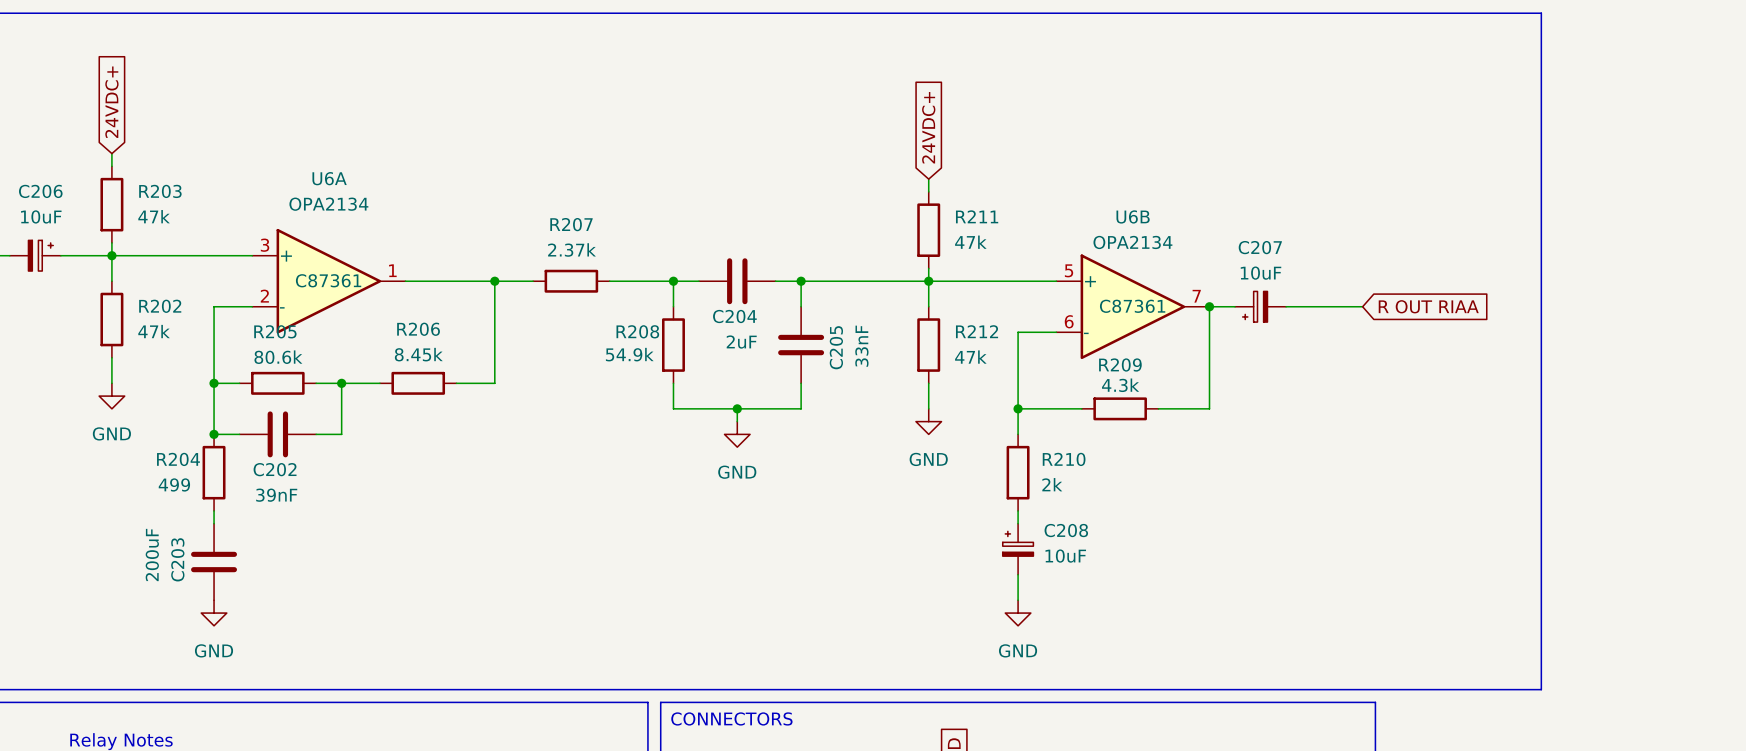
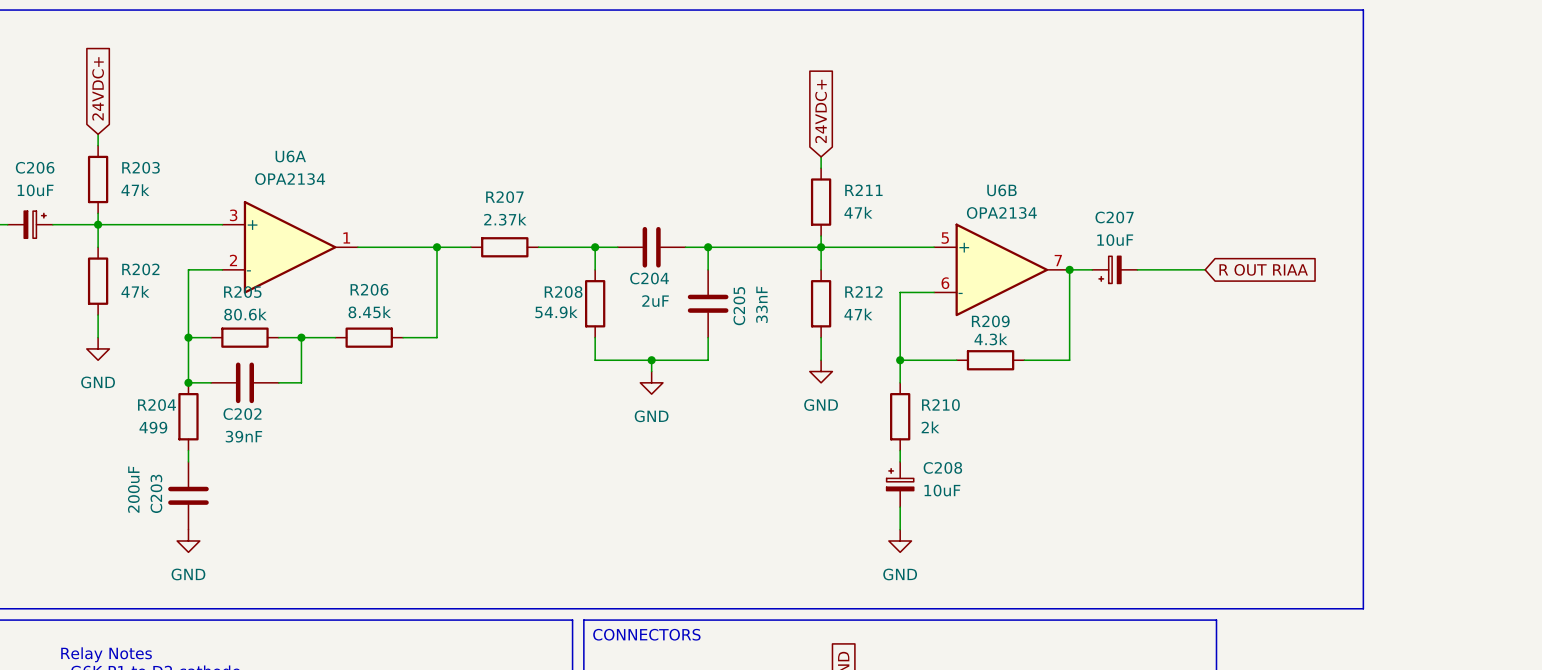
U6A text: C87361 (328, 280) -> none
U6B text: C87361 (1132, 306) -> none

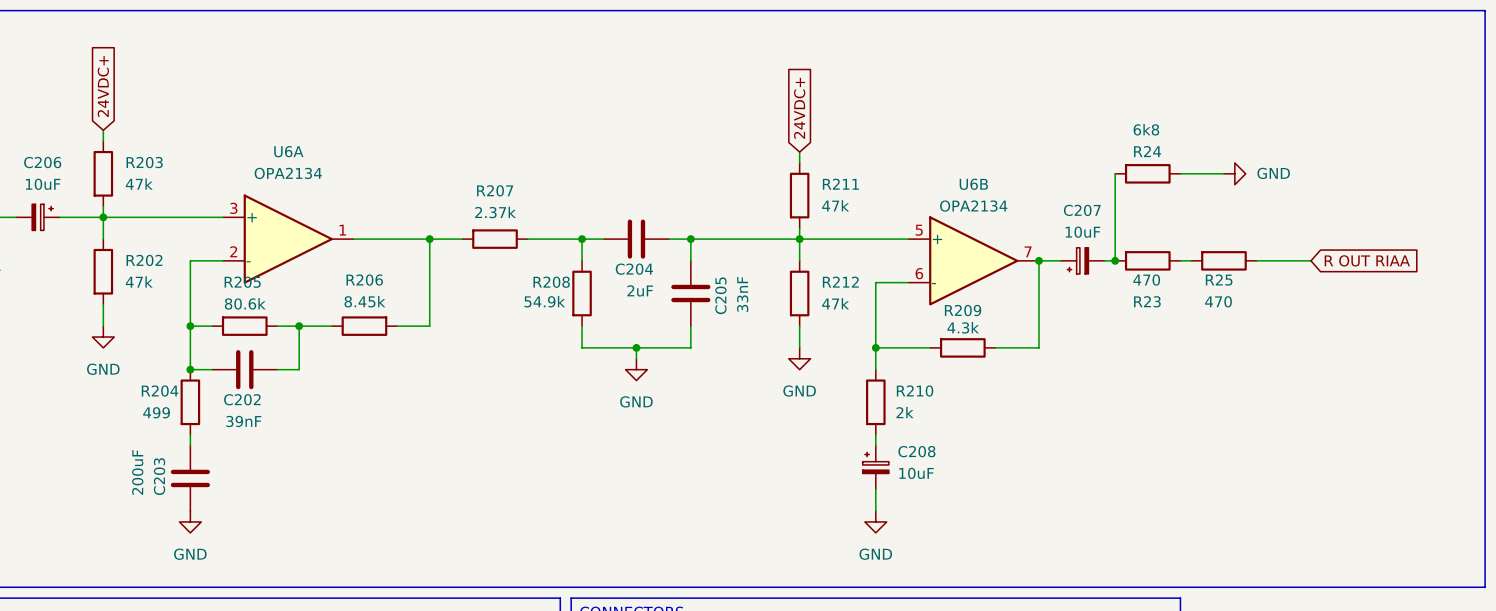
line: (1363, 10) (1363, 608) -> (1321, 10) (1485, 10) (1485, 587) (1321, 587)
R24: none -> 6k8 (1147, 173)
wire: none -> (1180, 173) (1223, 173)
power symbol: none -> GND (1234, 173)
wire: (1148, 269) (1205, 269) -> (1115, 260) (1115, 173)
junction: none -> (1115, 260)
R23: none -> 470 (1147, 260)
wire: none -> (1180, 260) (1191, 260)
R25: none -> 470 (1223, 260)
global label position: R OUT RIAA (1263, 269) -> R OUT RIAA (1367, 260)
wire: none -> (1256, 260) (1311, 260)

